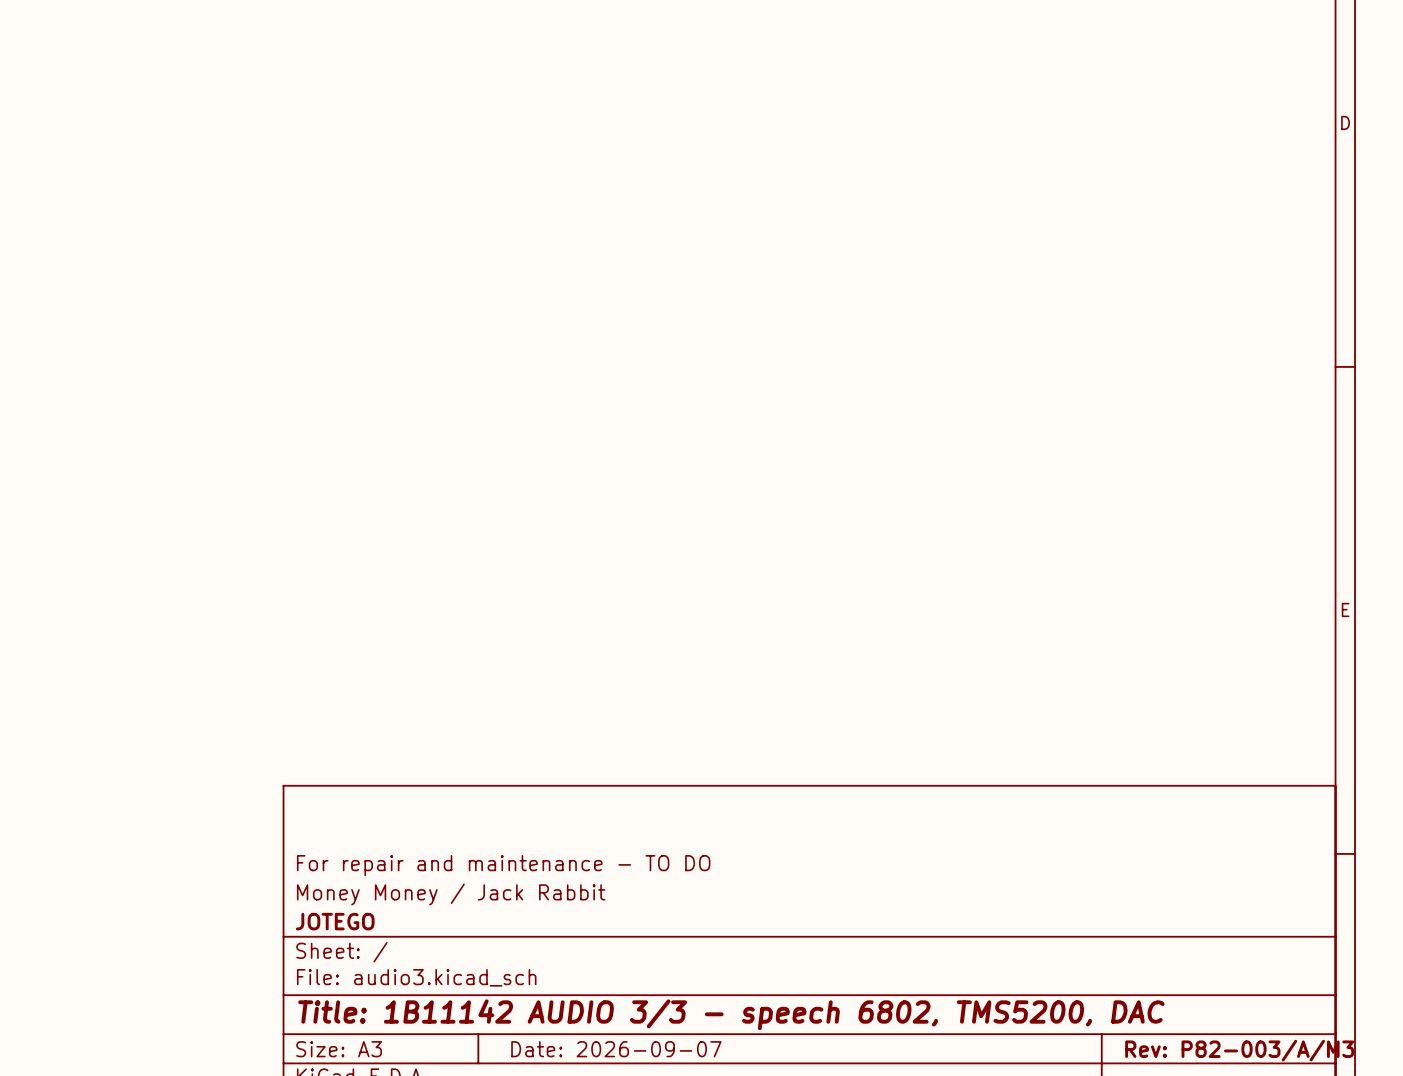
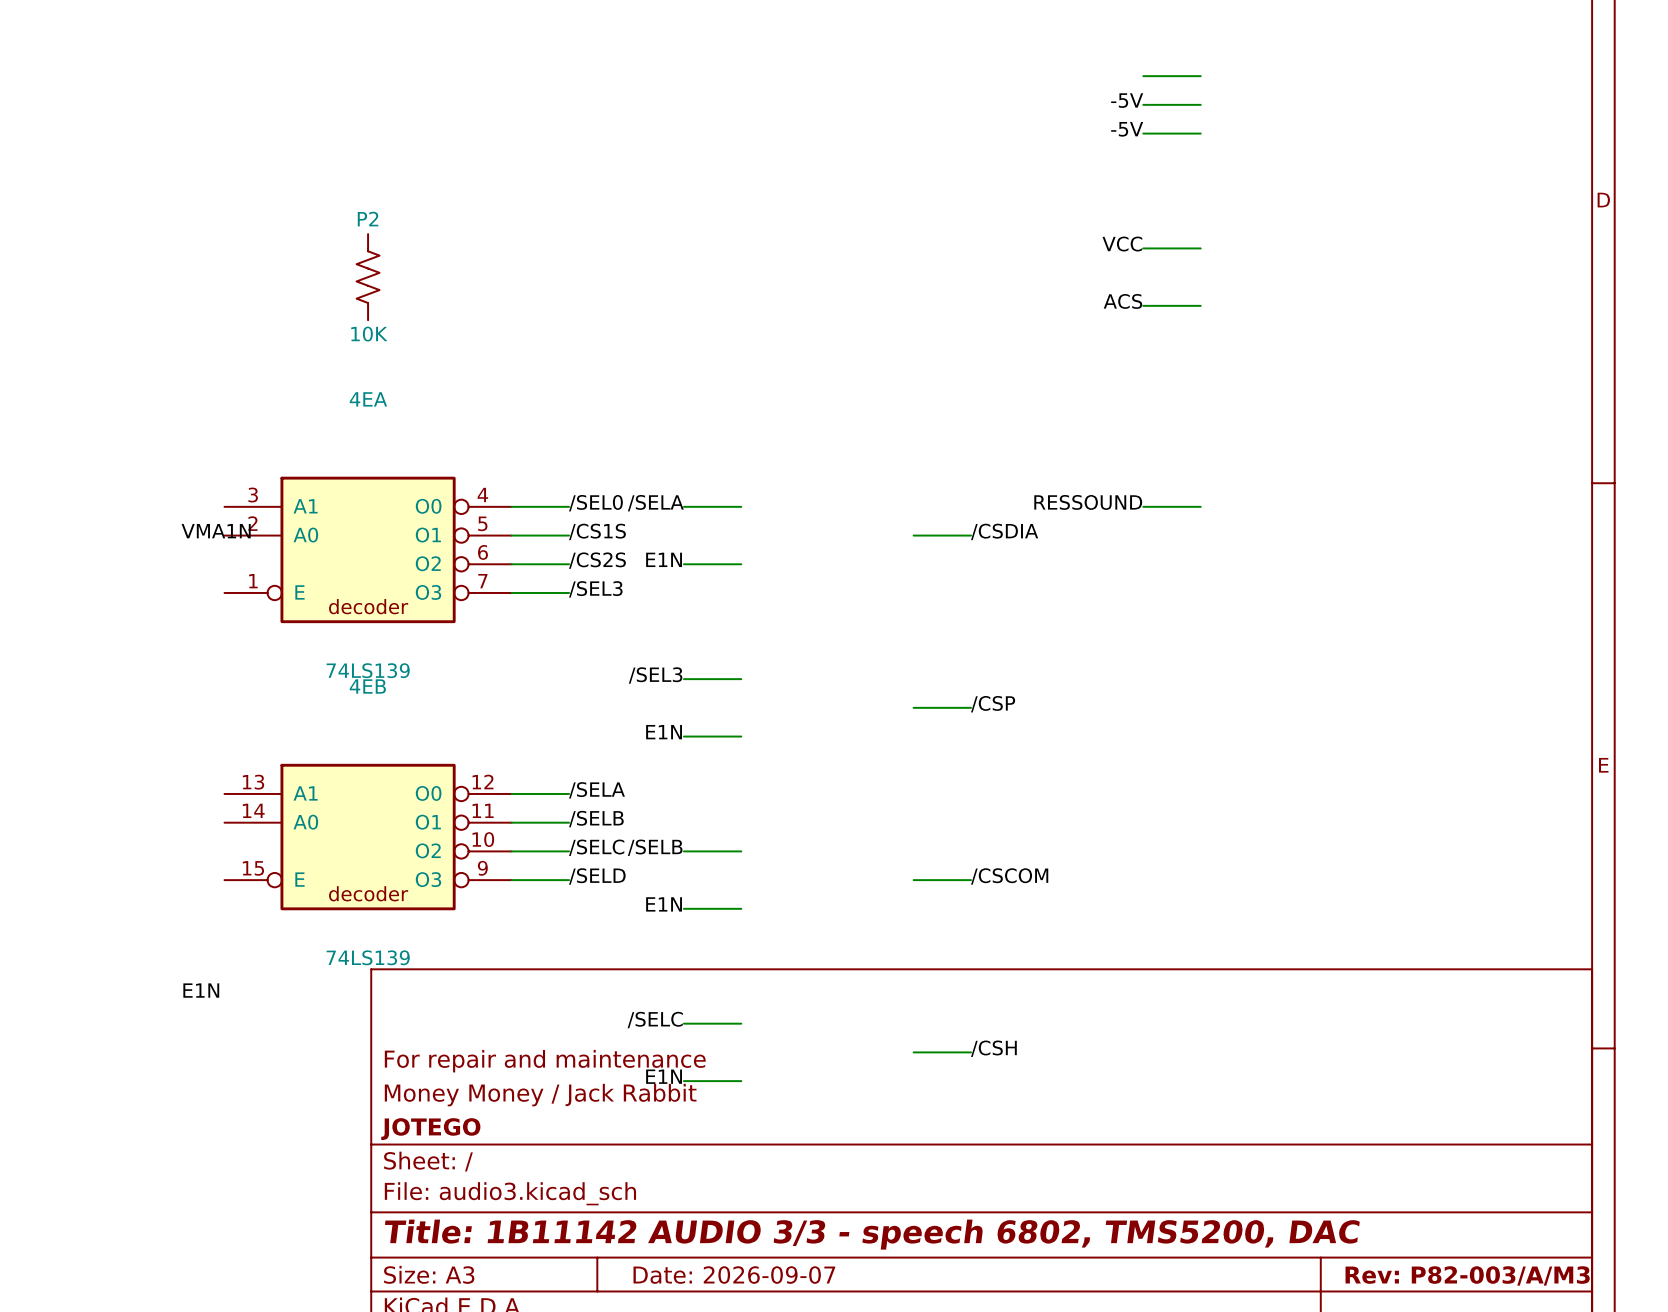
wire: none -> (1143, 76) (1200, 76)
label: none -> -5V (1127, 100)
wire: none -> (1143, 104) (1200, 104)
label: none -> -5V (1127, 129)
wire: none -> (1143, 133) (1200, 133)
label: none -> VCC (1122, 244)
wire: none -> (1143, 248) (1200, 248)
P2: none -> 10K (368, 277)
label: none -> ACS (1122, 301)
wire: none -> (1143, 305) (1200, 305)
label: none -> RESSOUND (1088, 502)
label: none -> /SEL0 (595, 503)
label: none -> /SELA (655, 503)
wire: none -> (511, 506) (569, 506)
wire: none -> (683, 506) (741, 506)
wire: none -> (1143, 506) (1200, 506)
label: none -> VMA1N (216, 531)
label: none -> /CS1S (597, 531)
label: none -> /CSDIA (1004, 531)
wire: none -> (511, 535) (569, 535)
wire: none -> (913, 535) (971, 535)
4EA: none -> 74LS139 (368, 549)
label: none -> E1N (664, 559)
label: none -> /CS2S (597, 560)
wire: none -> (511, 564) (569, 564)
wire: none -> (683, 564) (741, 564)
label: none -> /SEL3 (595, 589)
wire: none -> (511, 592) (569, 592)
label: none -> /SEL3 (655, 675)
wire: none -> (683, 679) (741, 679)
label: none -> /CSP (993, 704)
wire: none -> (913, 707) (971, 707)
label: none -> E1N (664, 732)
wire: none -> (683, 736) (741, 736)
label: none -> /SELA (596, 790)
wire: none -> (511, 793) (569, 793)
label: none -> /SELB (596, 819)
wire: none -> (511, 822) (569, 822)
4EB: none -> 74LS139 (368, 837)
label: none -> /SELC (596, 847)
label: none -> /SELB (655, 847)
wire: none -> (511, 851) (569, 851)
wire: none -> (683, 851) (741, 851)
label: none -> /SELD (597, 876)
label: none -> /CSCOM (1009, 876)
wire: none -> (511, 880) (569, 880)
wire: none -> (913, 880) (971, 880)
label: none -> E1N (664, 904)
wire: none -> (683, 908) (741, 908)
label: none -> E1N (201, 990)
label: none -> /SELC (655, 1020)
wire: none -> (683, 1023) (741, 1023)
label: none -> /CSH (993, 1048)
wire: none -> (913, 1052) (971, 1052)
title block: For repair and maintenance - TO DO (503, 865) -> For repair and maintenance (545, 1061)
label: none -> E1N (664, 1076)
wire: none -> (683, 1081) (741, 1081)

